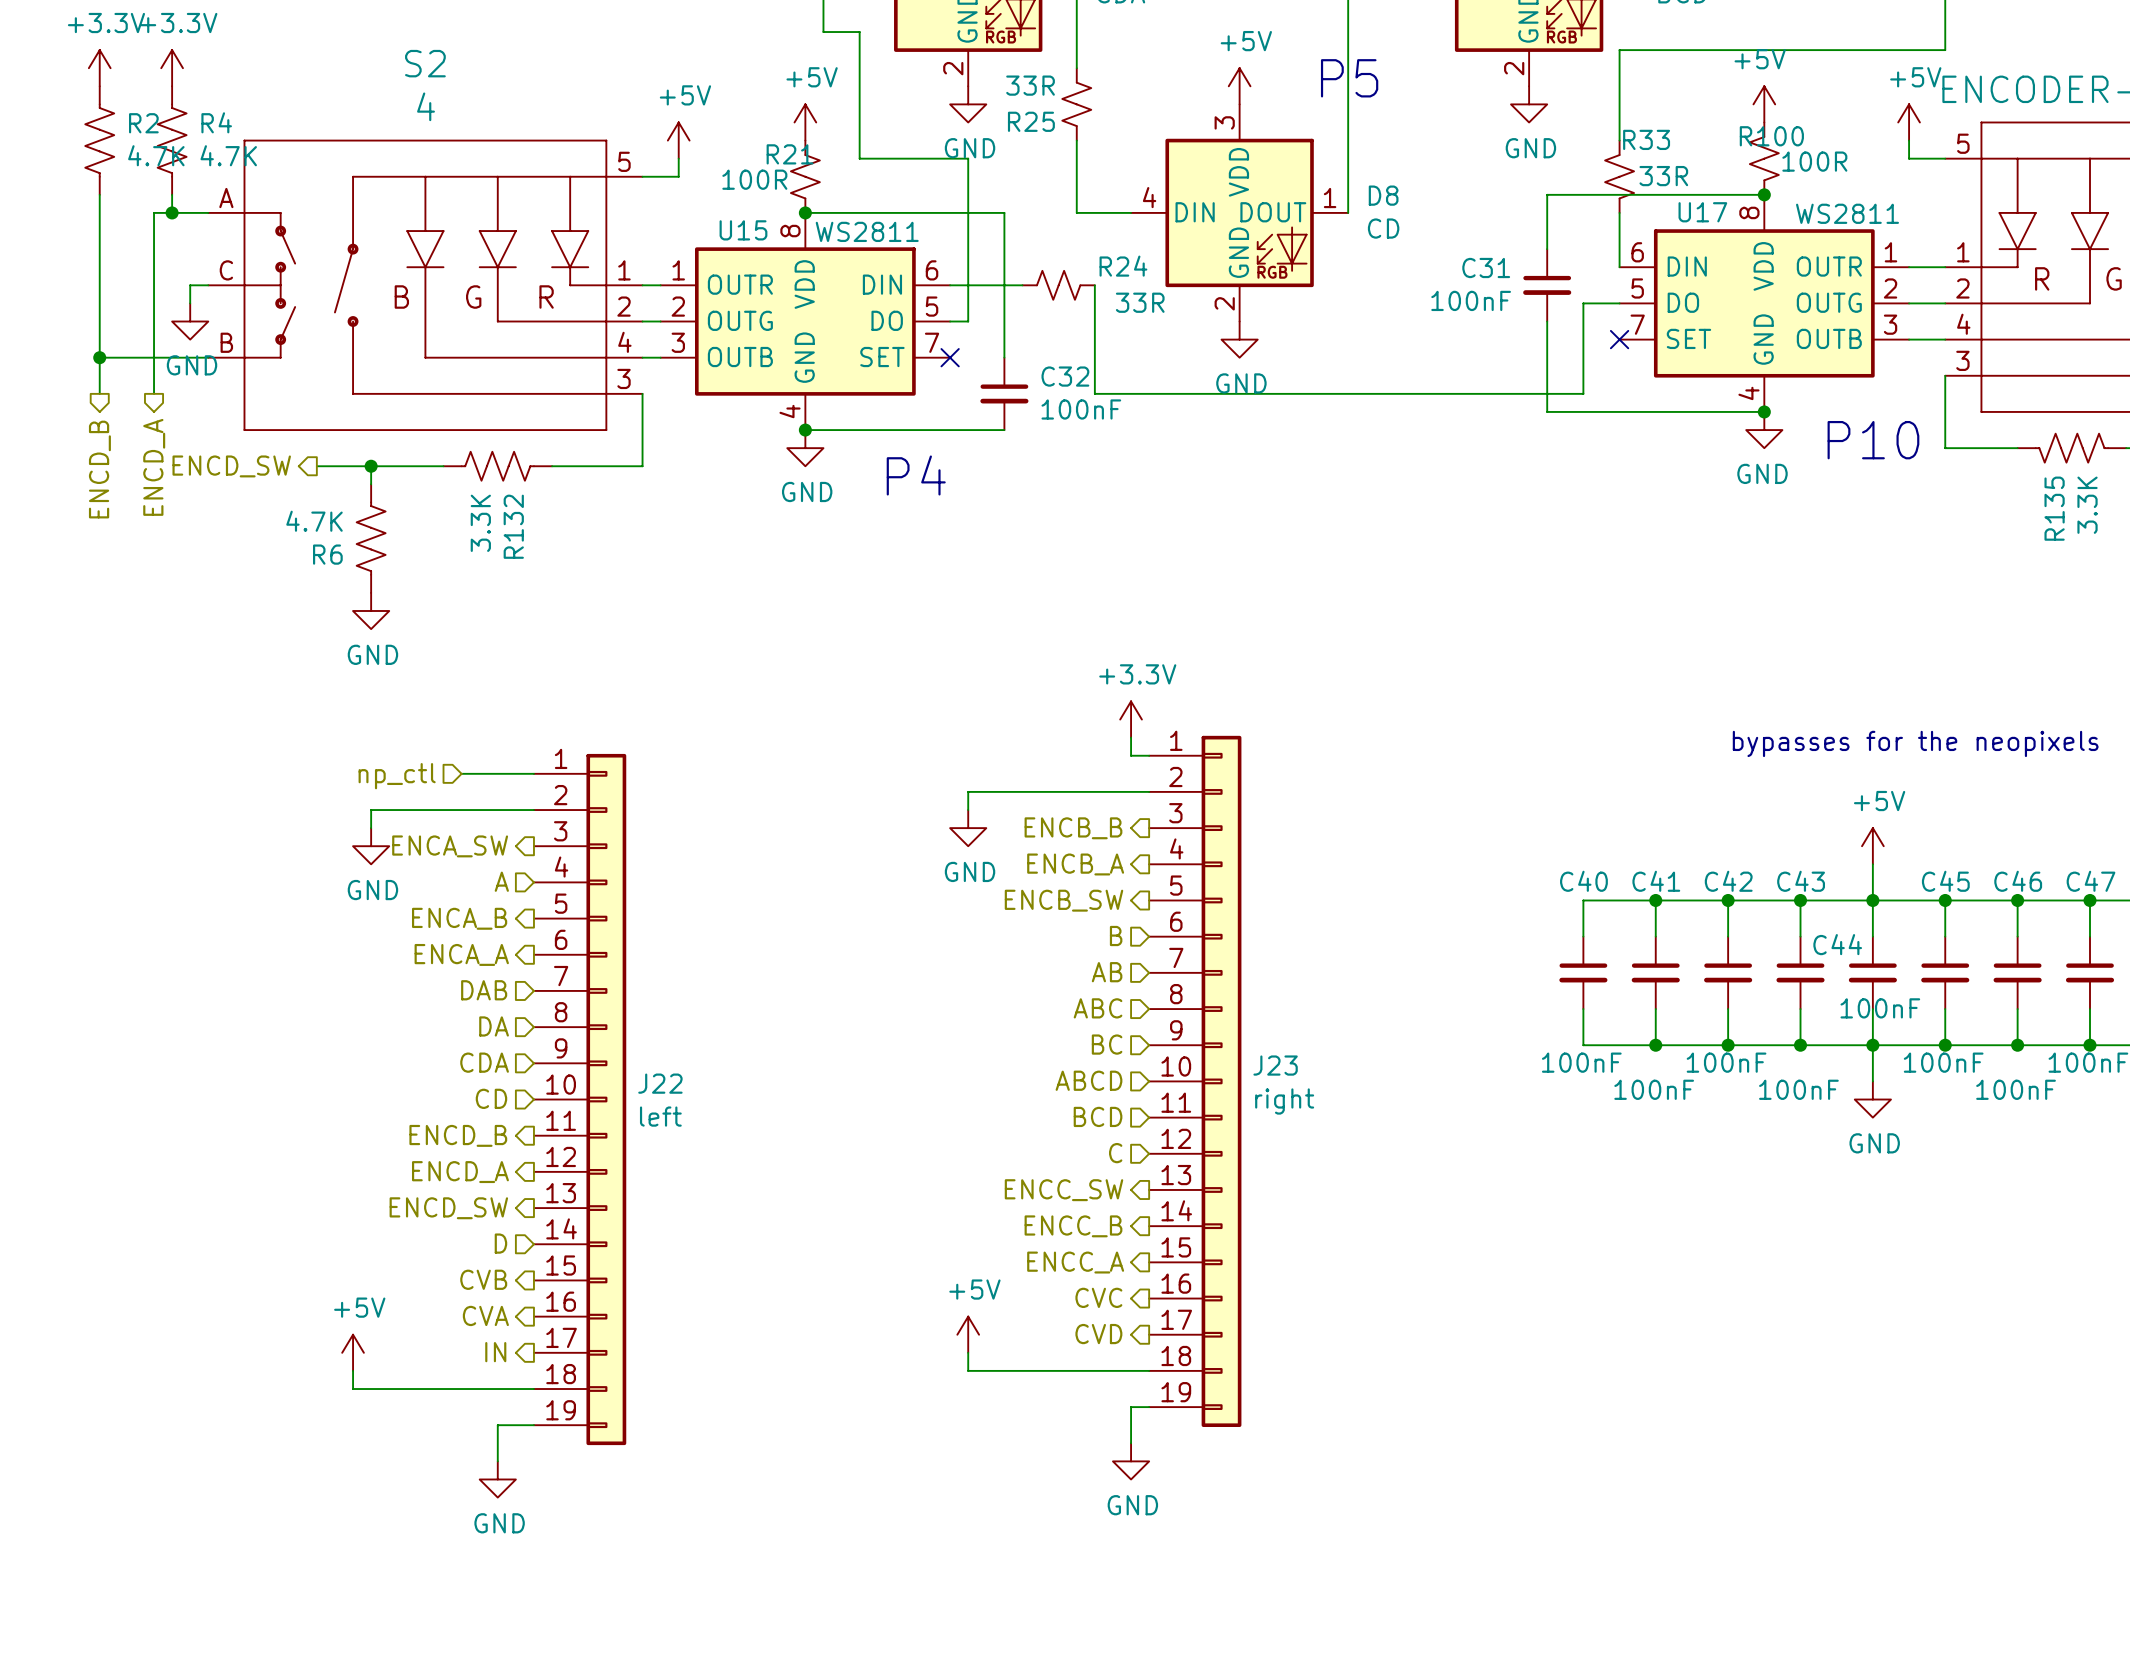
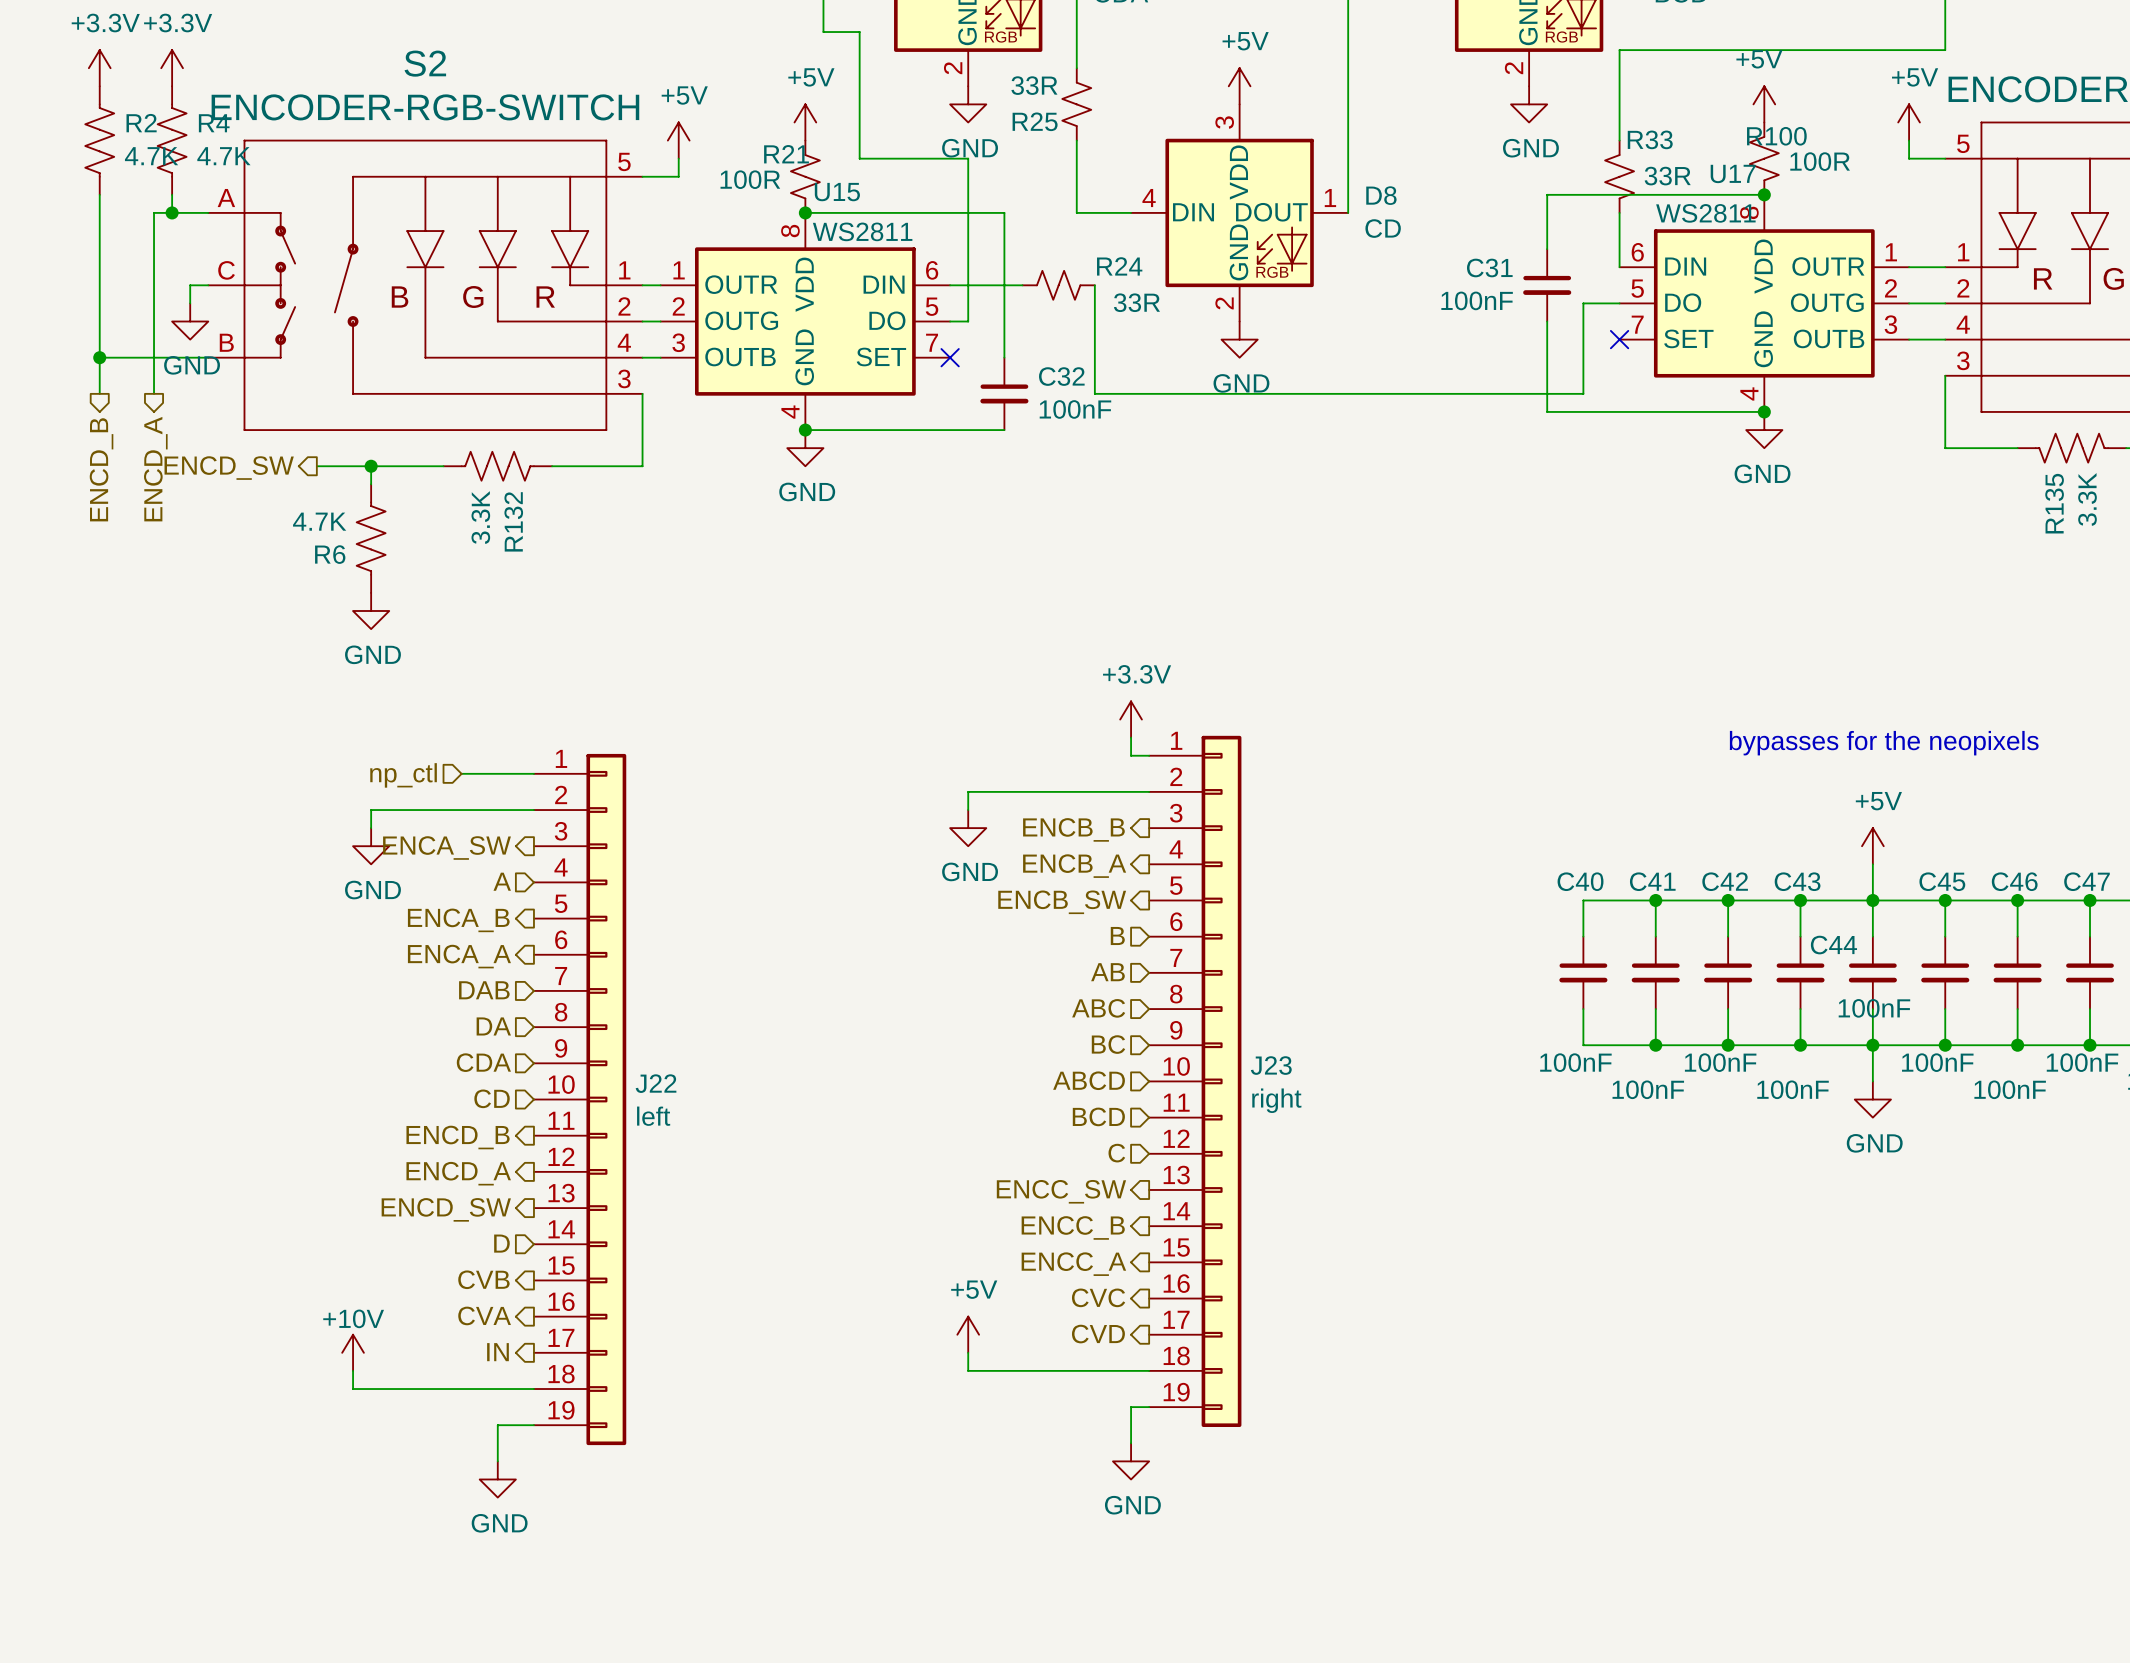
text: P5 (1349, 78) -> none
S2 value: 4 (426, 106) -> ENCODER-RGB-SWITCH (425, 107)
U17 name position: U17 (1702, 212) -> U17 (1733, 173)
U17 value position: WS2811 (1847, 213) -> WS2811 (1705, 213)
U15 name position: U15 (743, 230) -> U15 (837, 192)
text: P10 (1873, 440) -> none
text: P4 (916, 475) -> none
power symbol: +5V (353, 1352) -> +10V (353, 1352)

